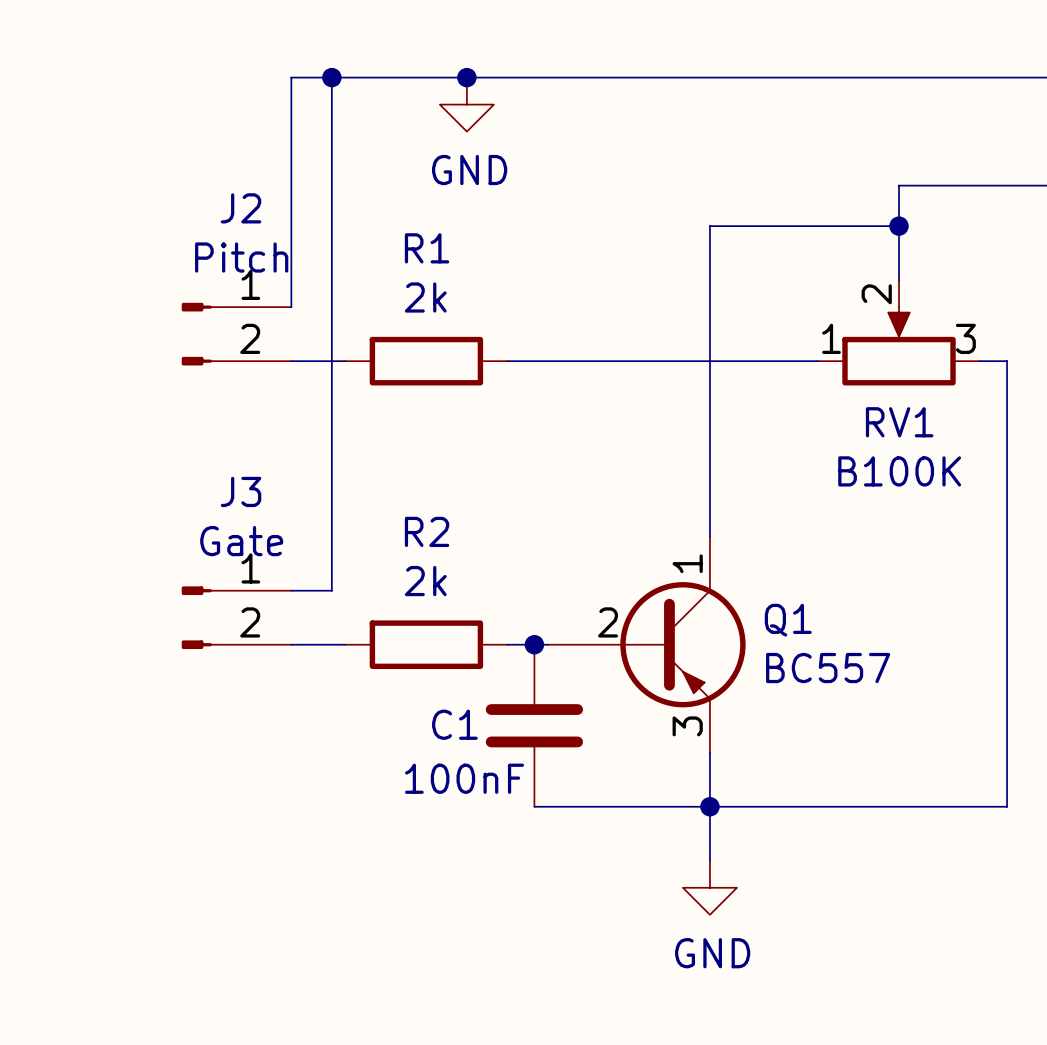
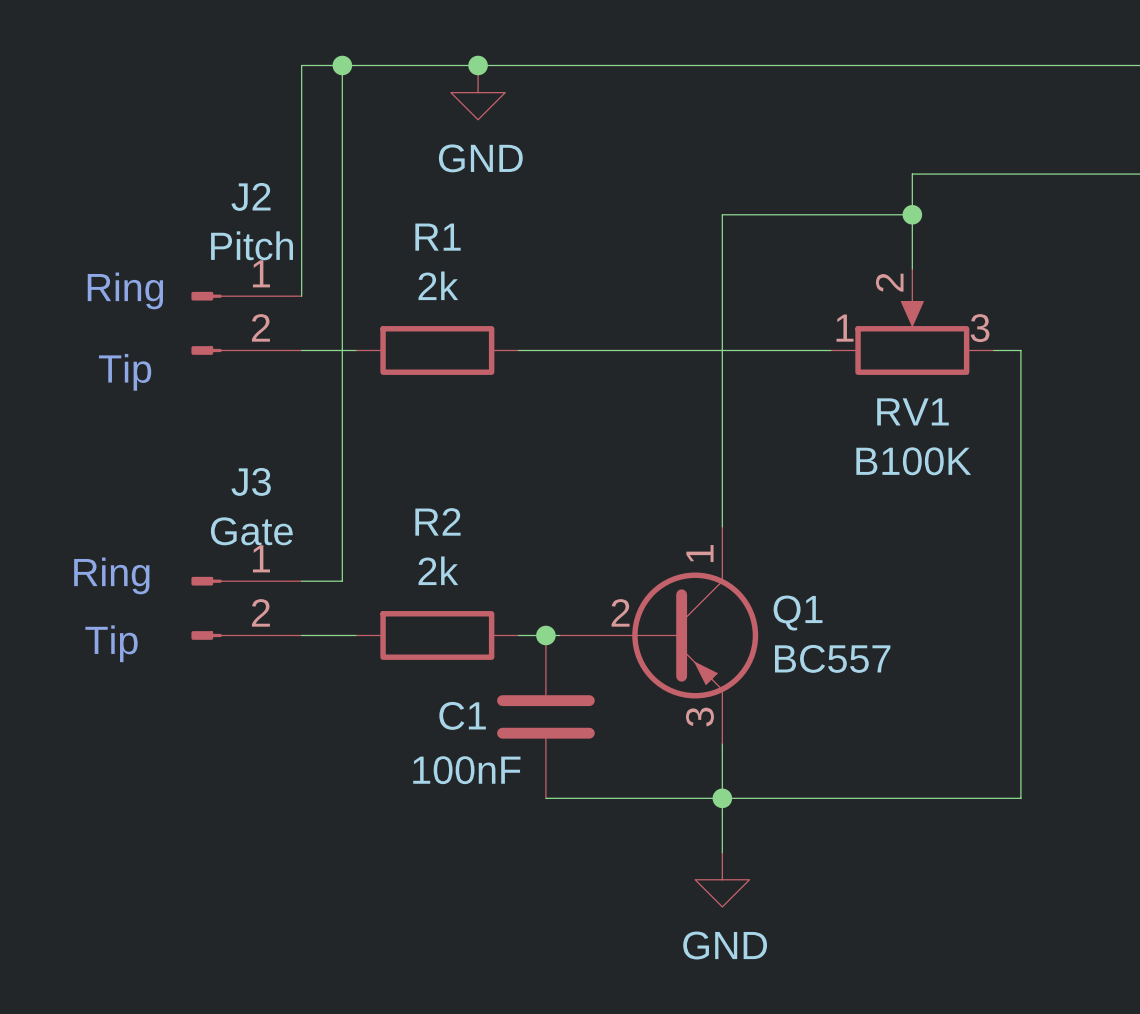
text: none -> Ring (125, 290)
text: none -> Tip (125, 372)
text: none -> Ring (111, 575)
text: none -> Tip (111, 643)

